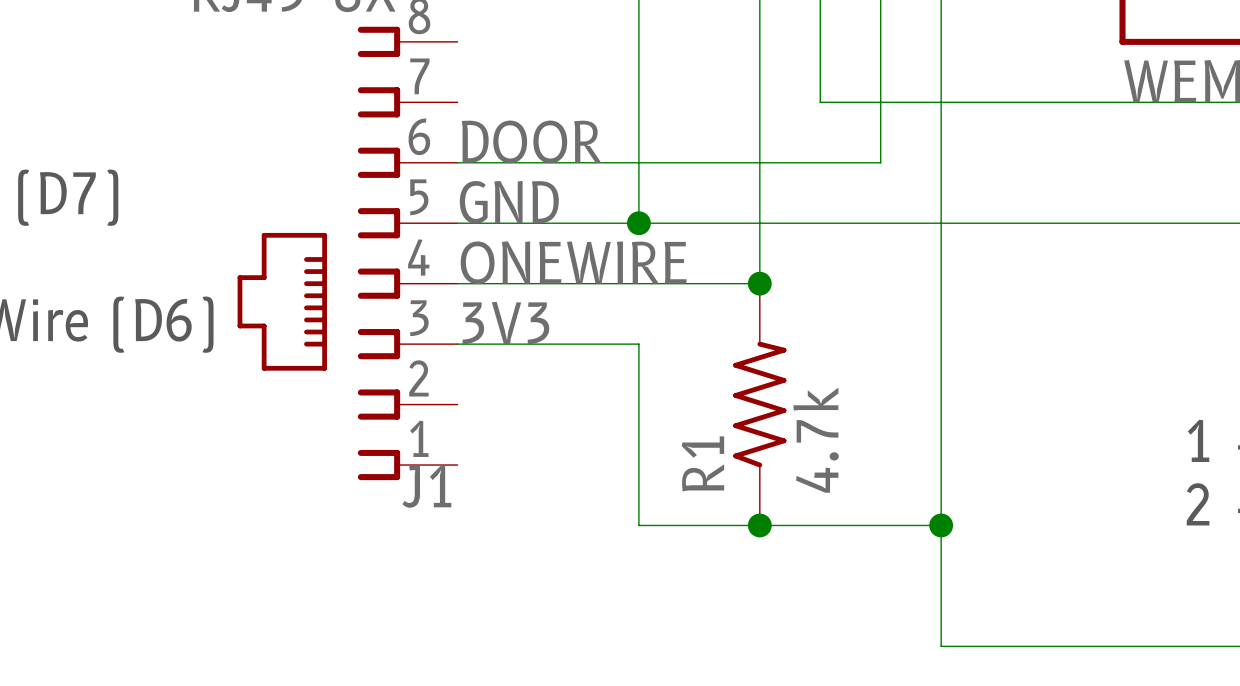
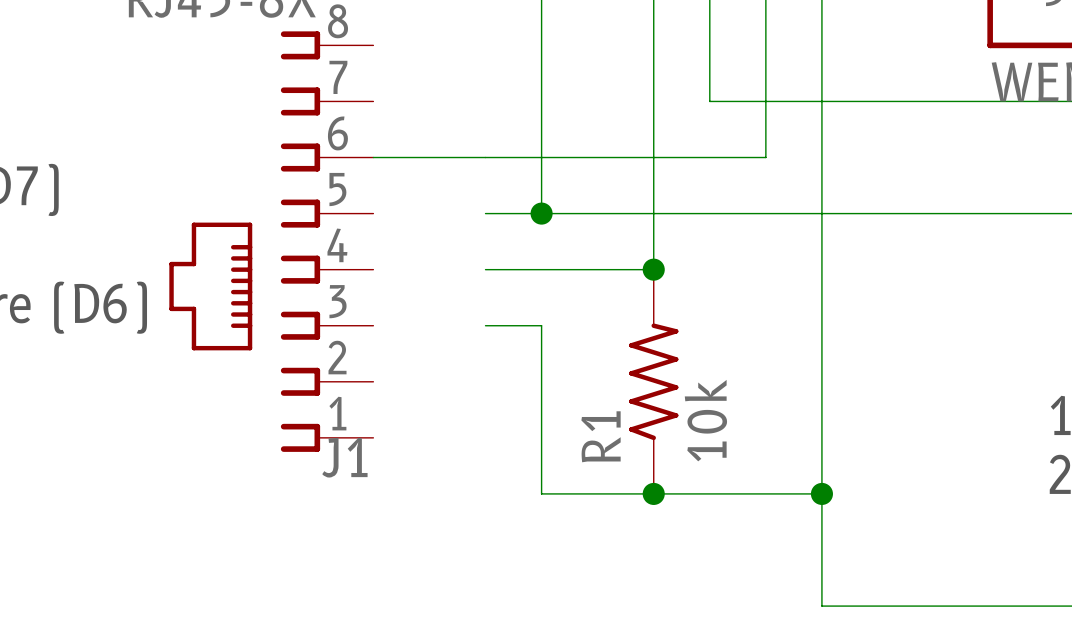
label: DOOR (531, 141) -> none
label: GND (509, 202) -> none
wire: (457, 223) (578, 223) -> none
label: ONEWIRE (573, 262) -> none
wire: (457, 283) (578, 283) -> none
label: 3V3 (505, 323) -> none
wire: (457, 344) (578, 344) -> none
R1 value: 4.7k (816, 440) -> 10k (705, 420)

